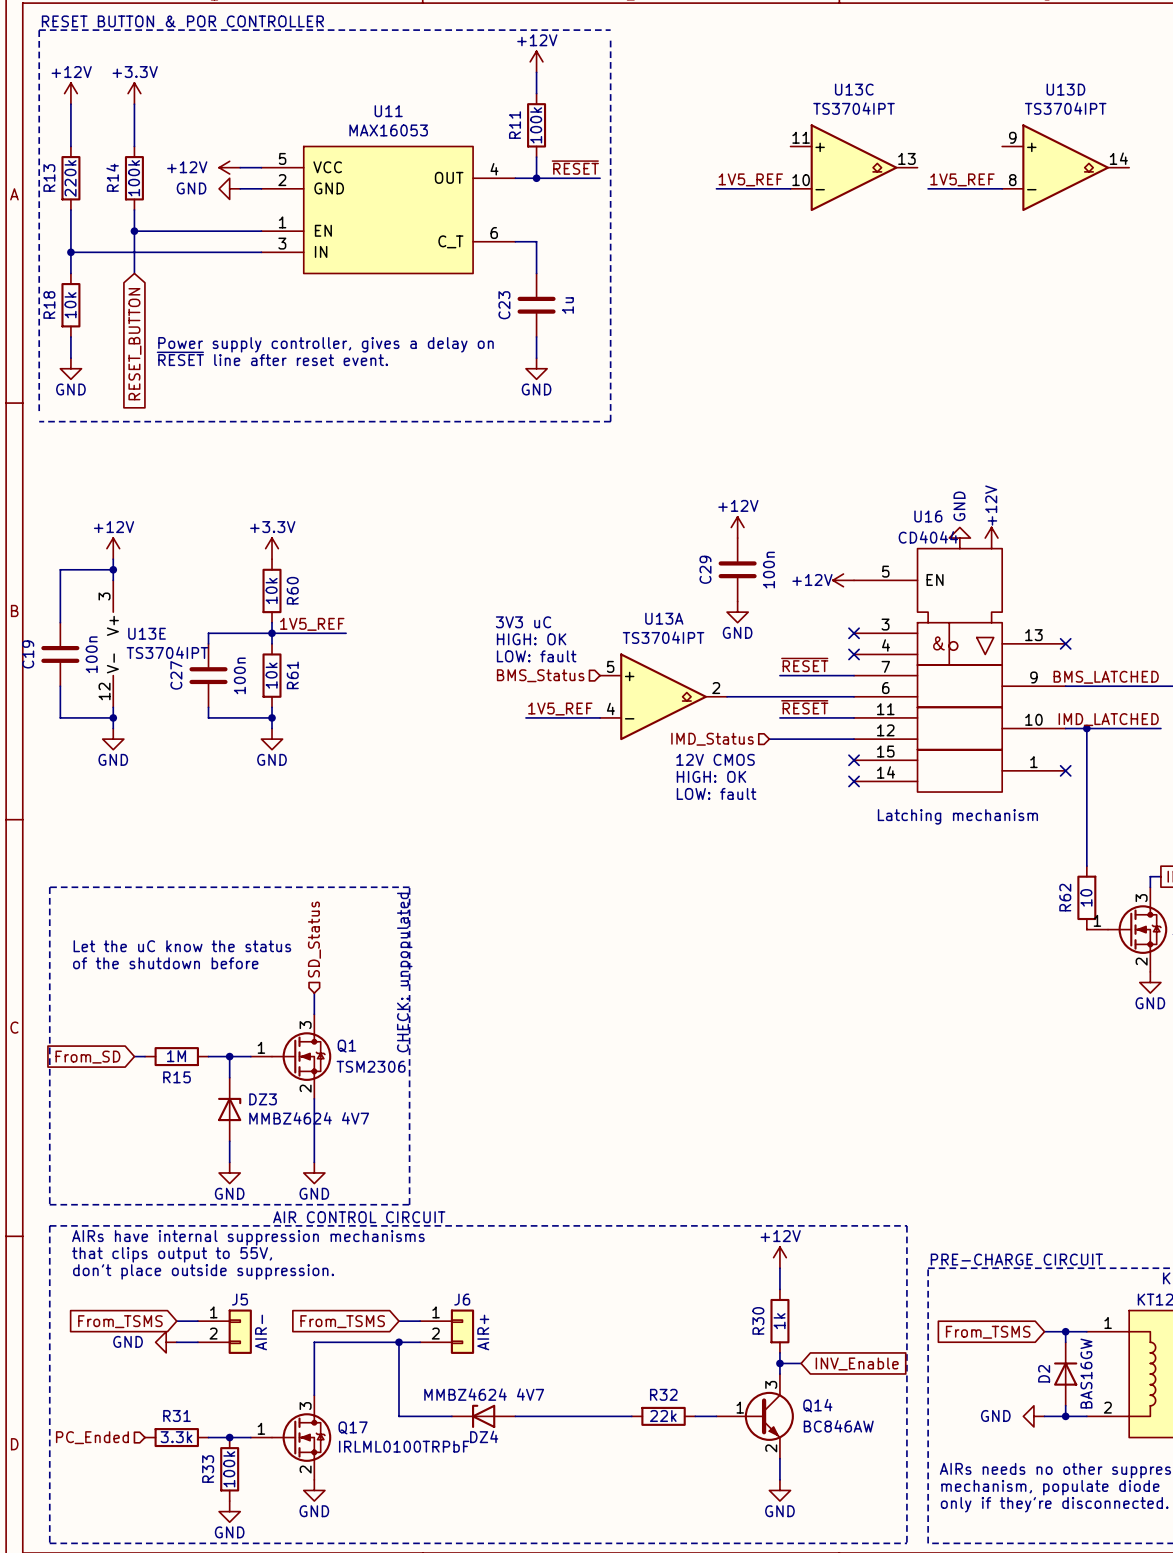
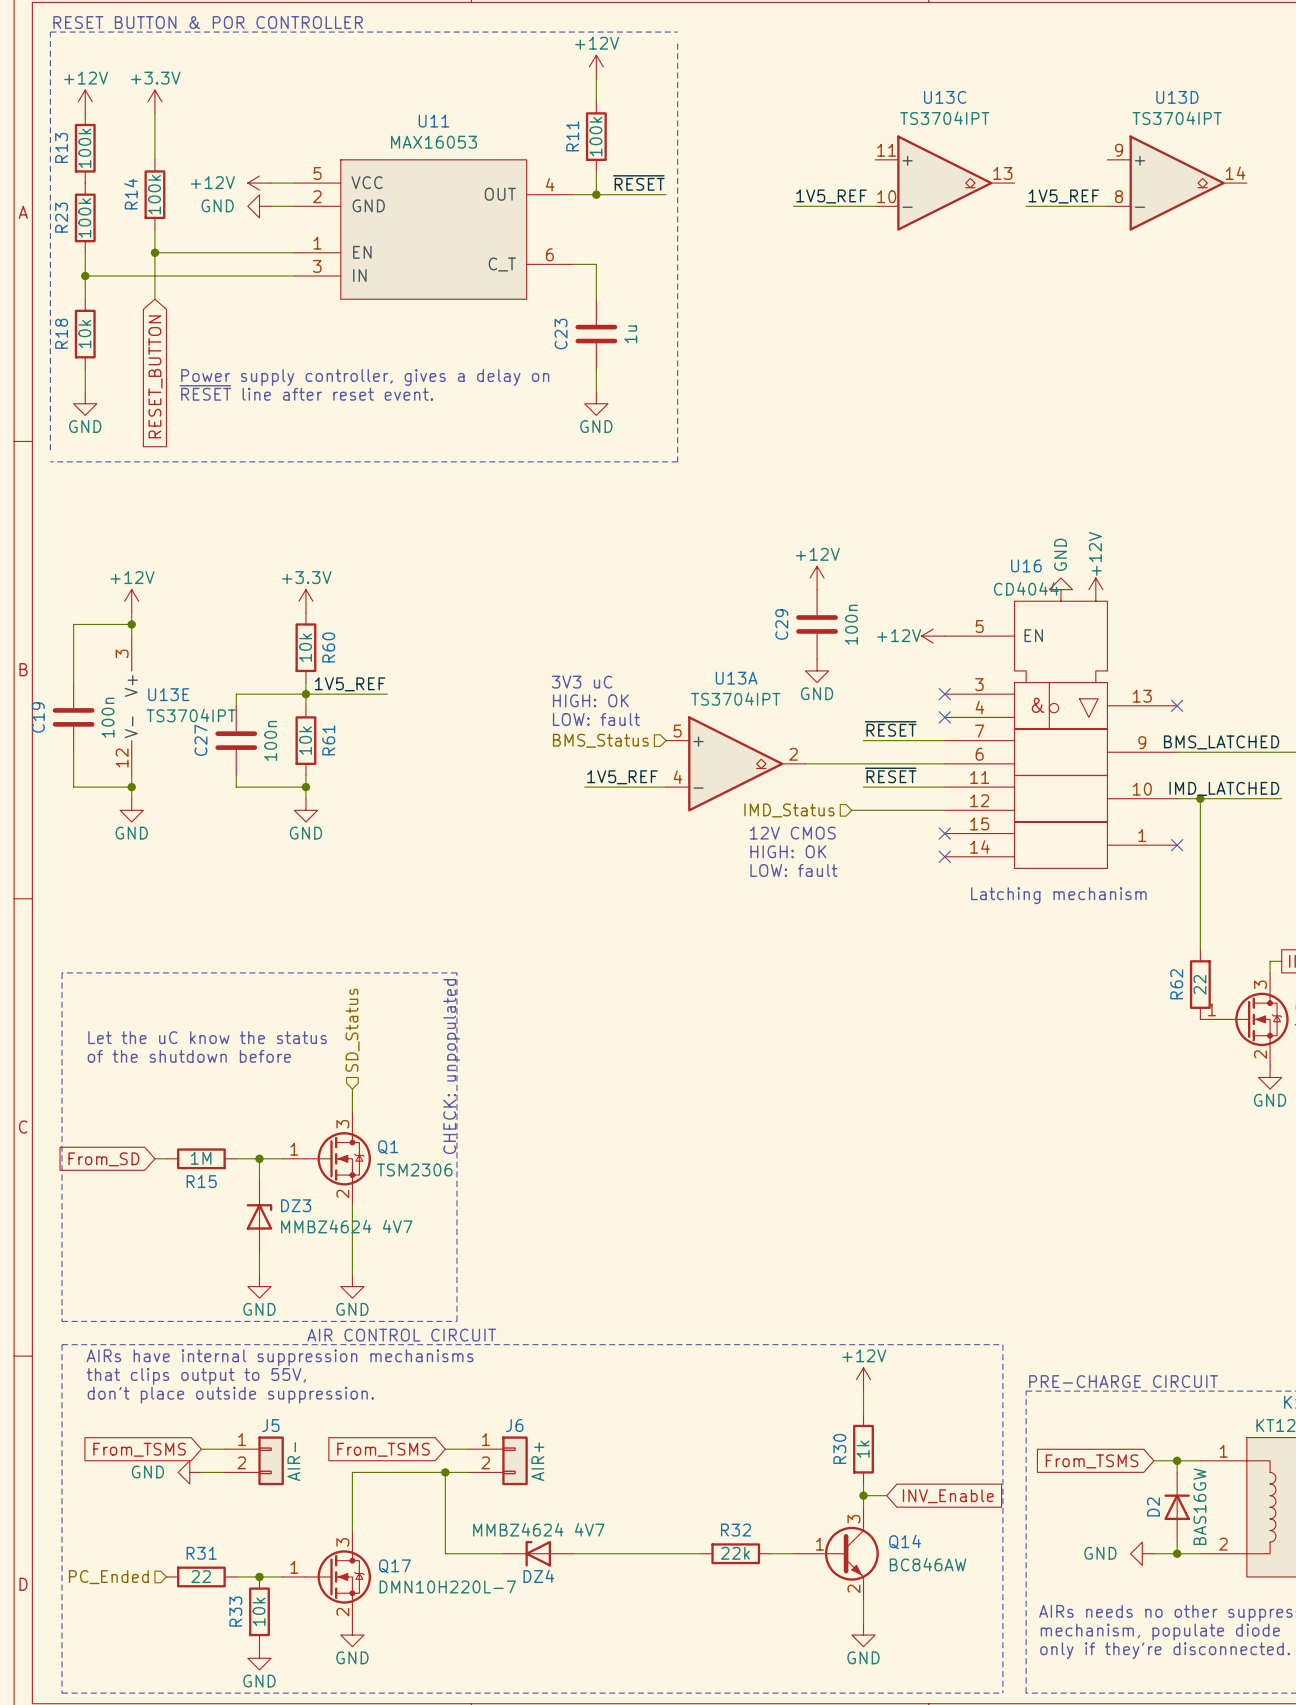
wire: (70, 104) (70, 146) -> none
R13 position: (70, 178) -> (85, 148)
R13 value: 220k (70, 178) -> 100k (84, 148)
R23: none -> 100k (85, 217)
R62 value: 10 (1086, 897) -> 22 (1199, 984)
R31 value: 3.3k (176, 1437) -> 22 (201, 1576)
Q17 value: IRLML0100TRPbF (404, 1446) -> DMN10H220L-7 (447, 1586)
R33 value: 100k (229, 1469) -> 10k (259, 1611)

